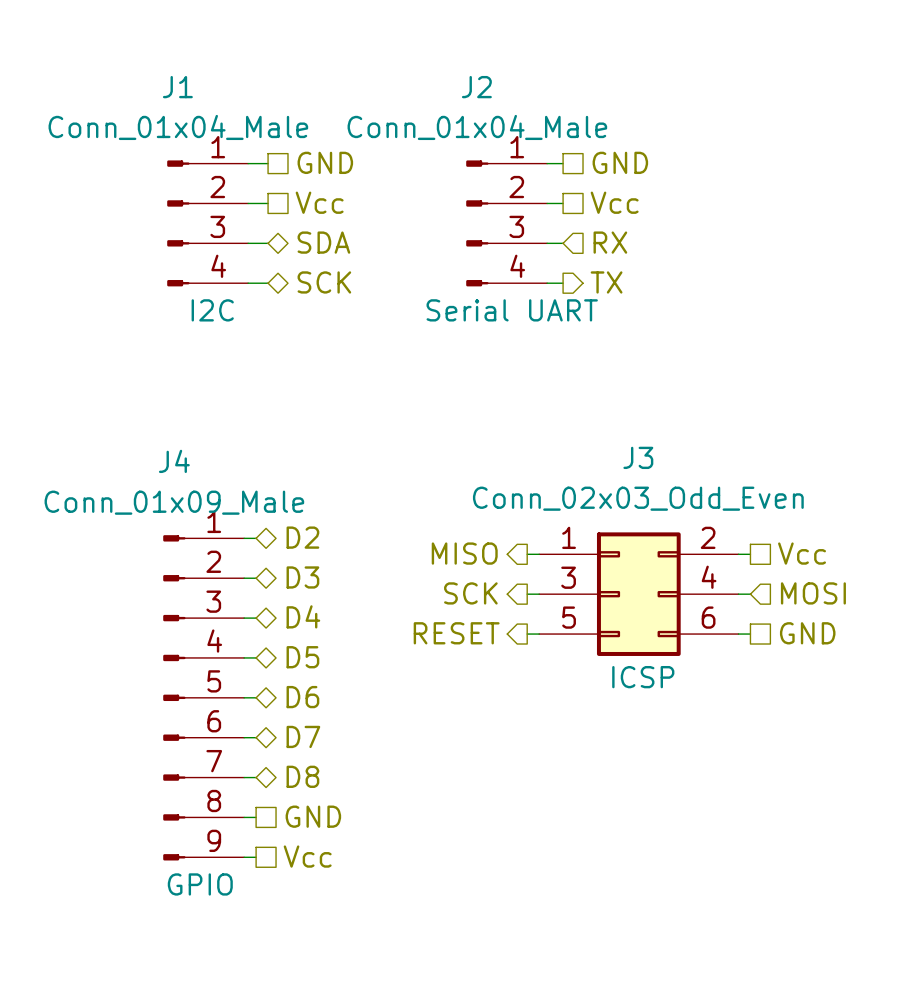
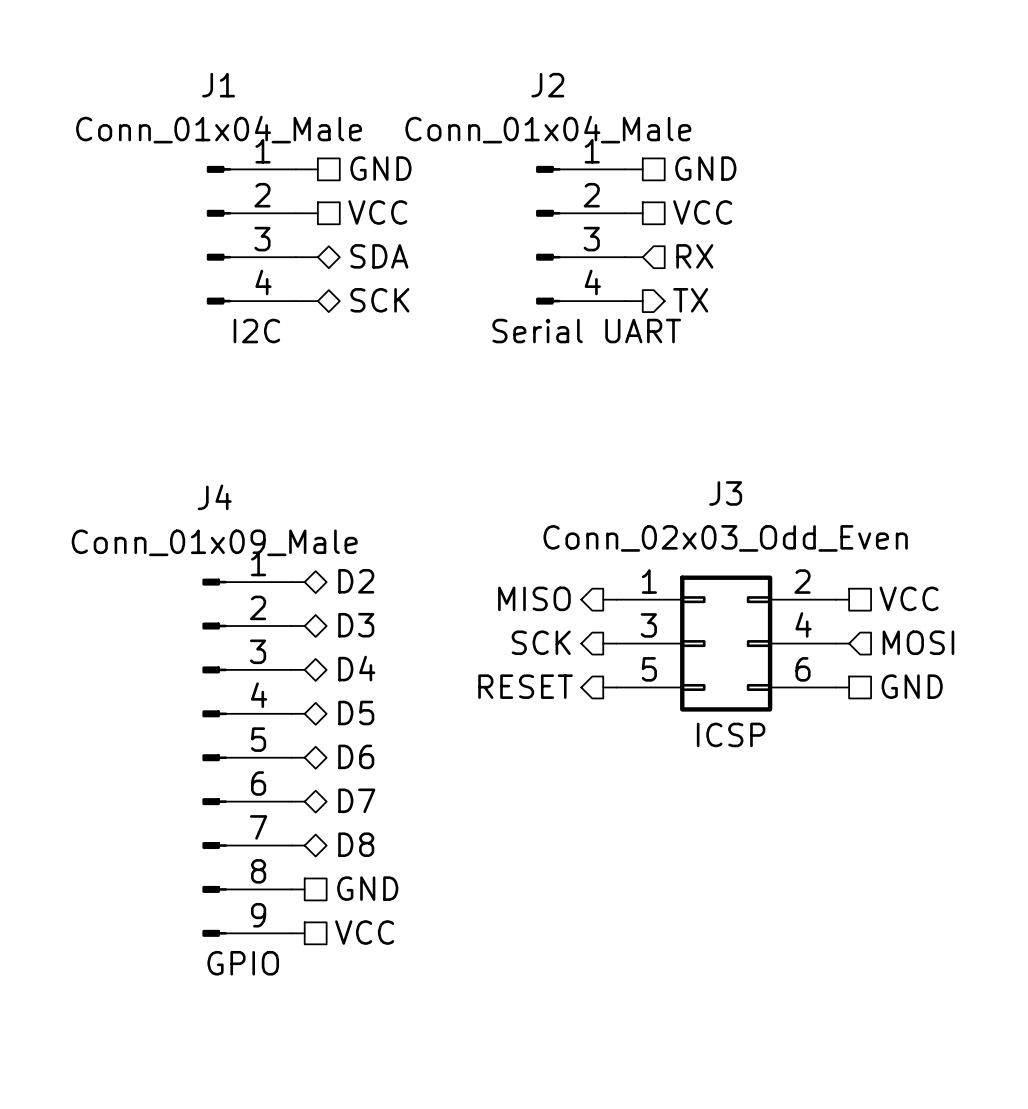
hierarchical label: Vcc (319, 202) -> VCC (377, 212)
hierarchical label: Vcc (614, 202) -> VCC (702, 212)
hierarchical label: Vcc (802, 553) -> VCC (909, 598)
hierarchical label: Vcc (307, 856) -> VCC (364, 932)

